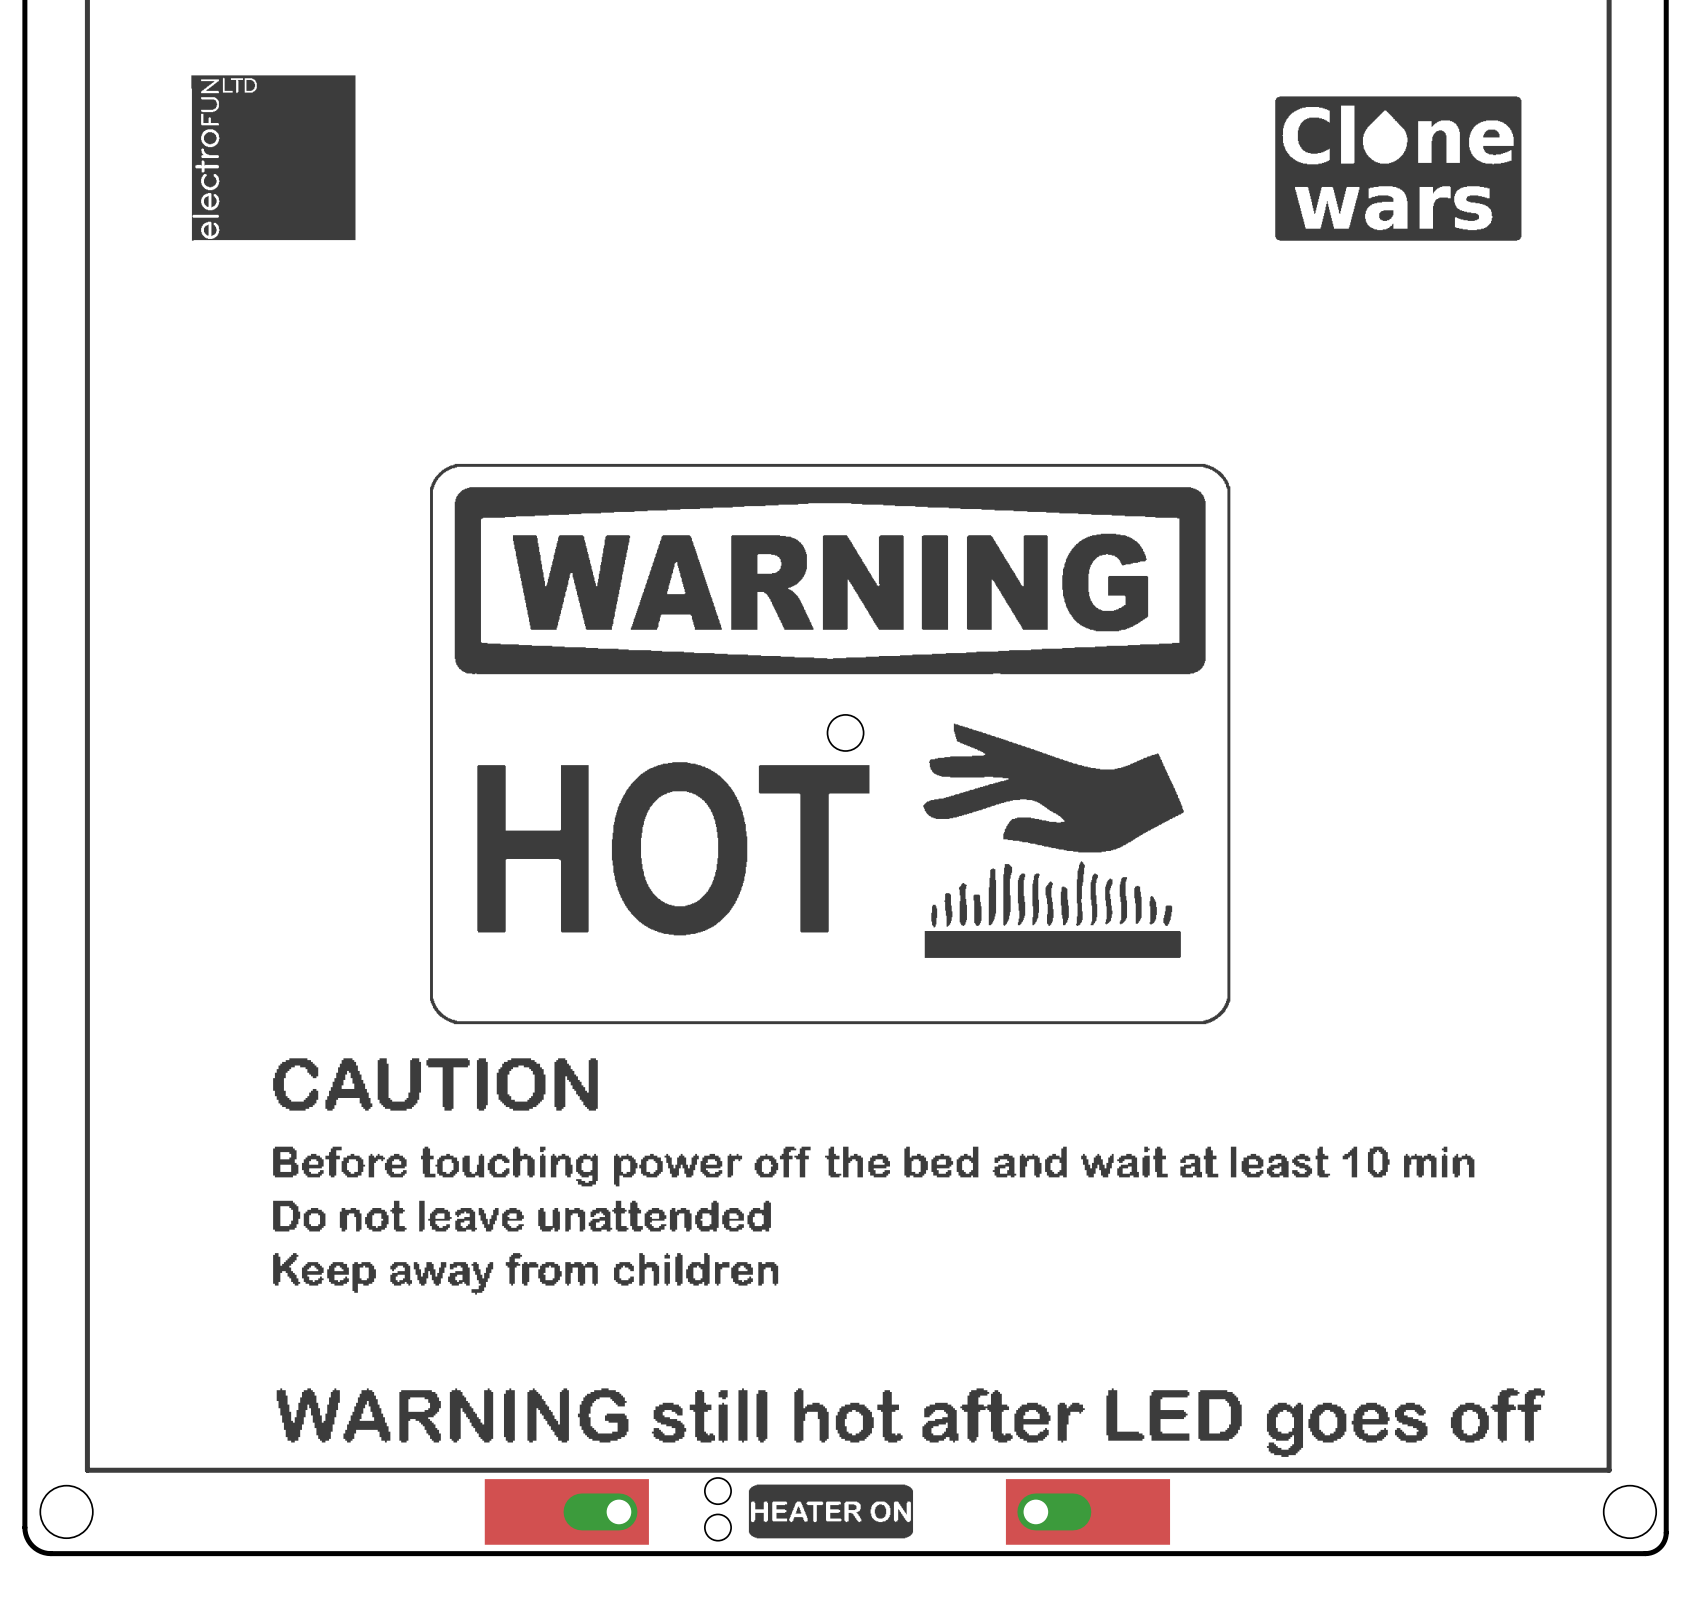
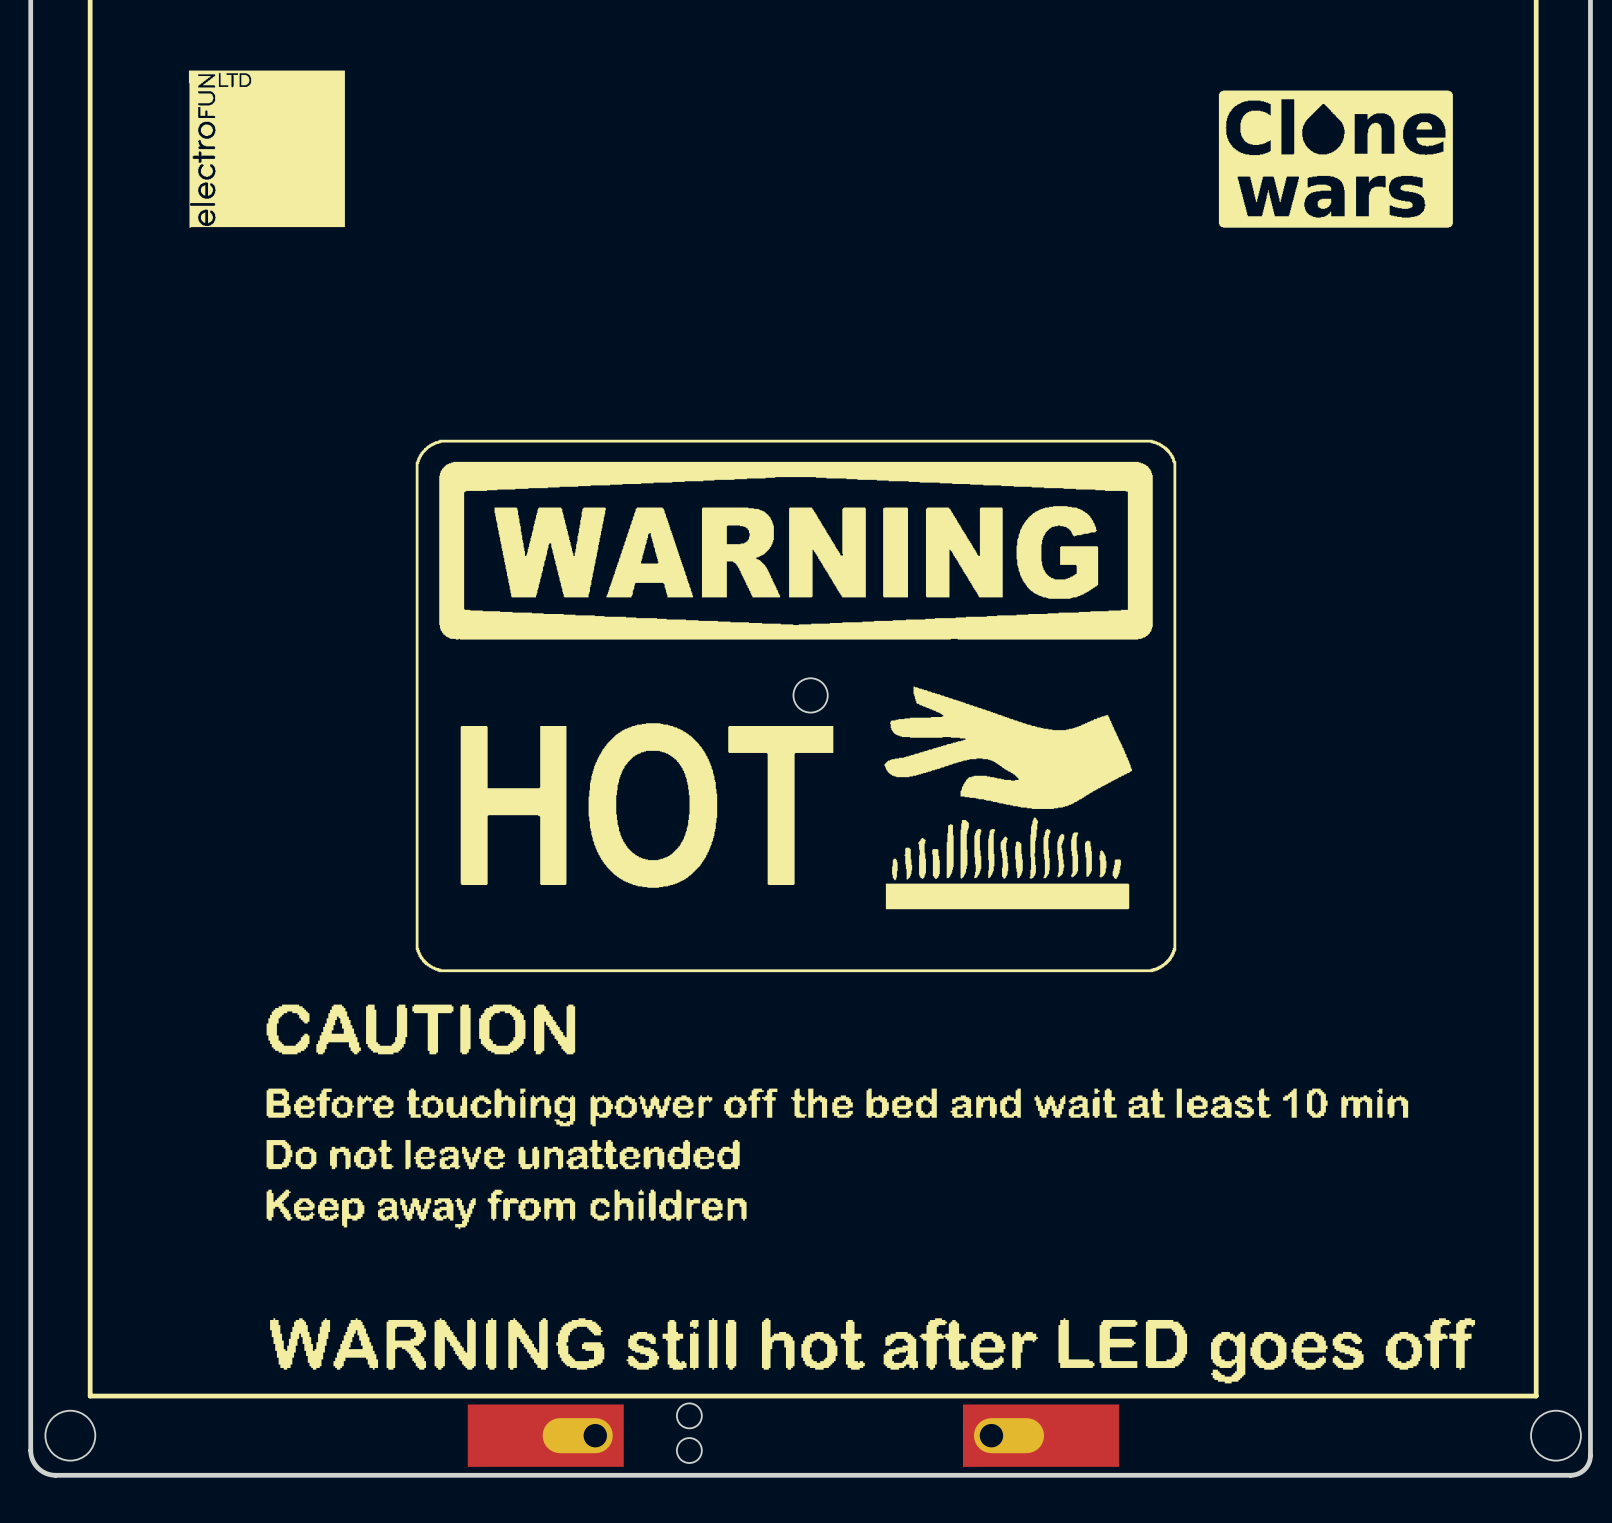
drawing: [748, 1484, 914, 1539] -> none

